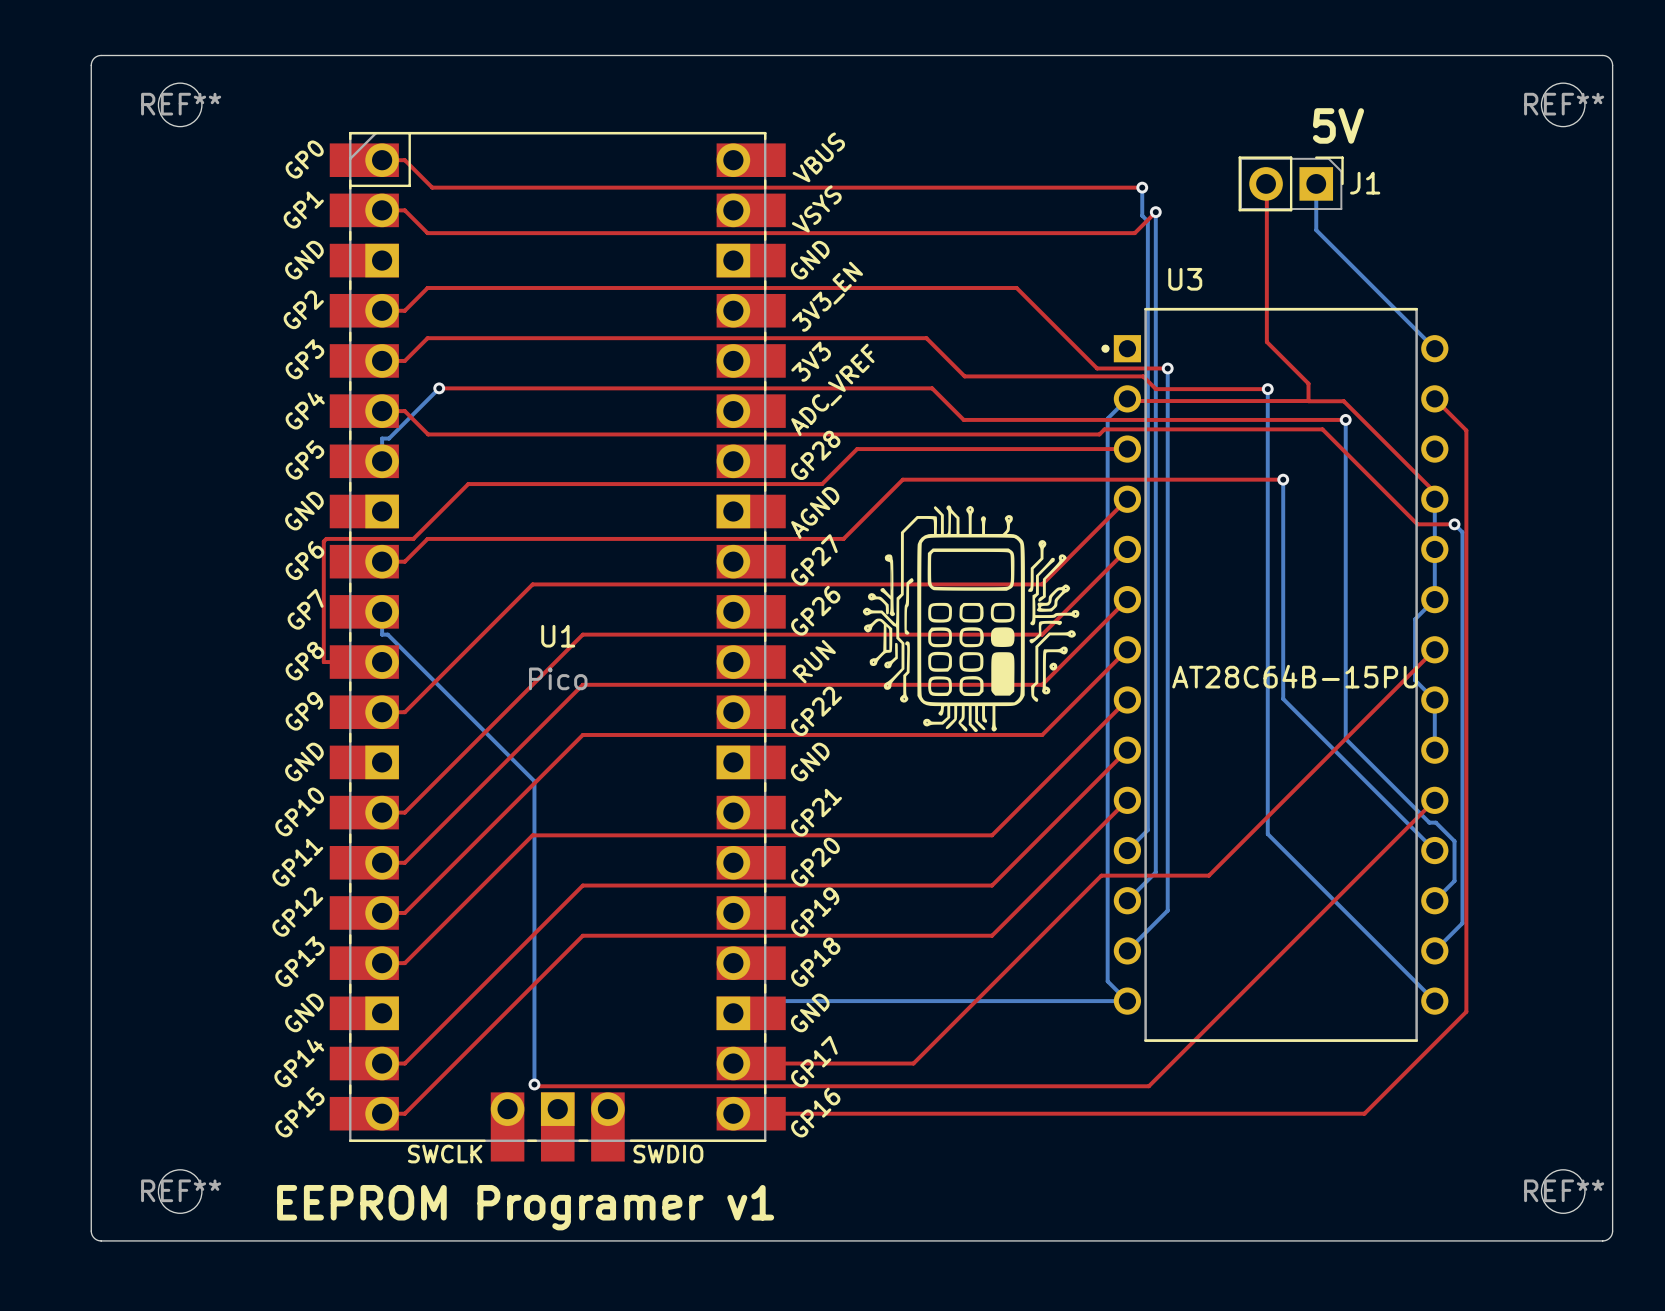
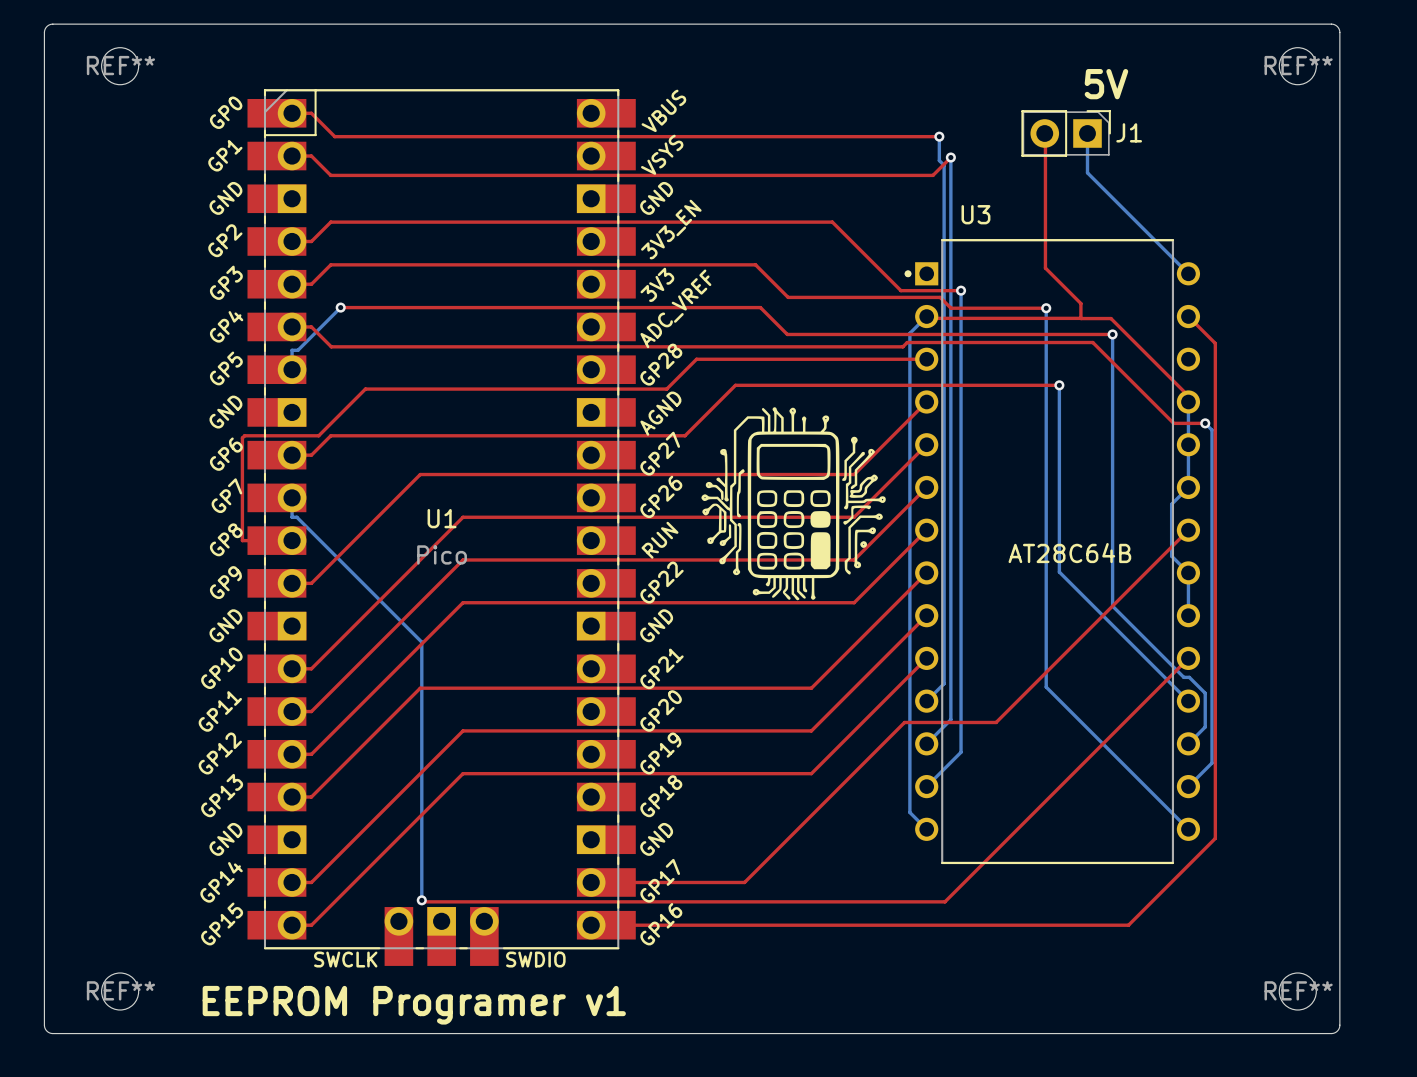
U3 value: AT28C64B-15PU (1295, 676) -> AT28C64B (1069, 553)
bottom track: (1127, 1001) (745, 1001) (733, 1013) -> none

